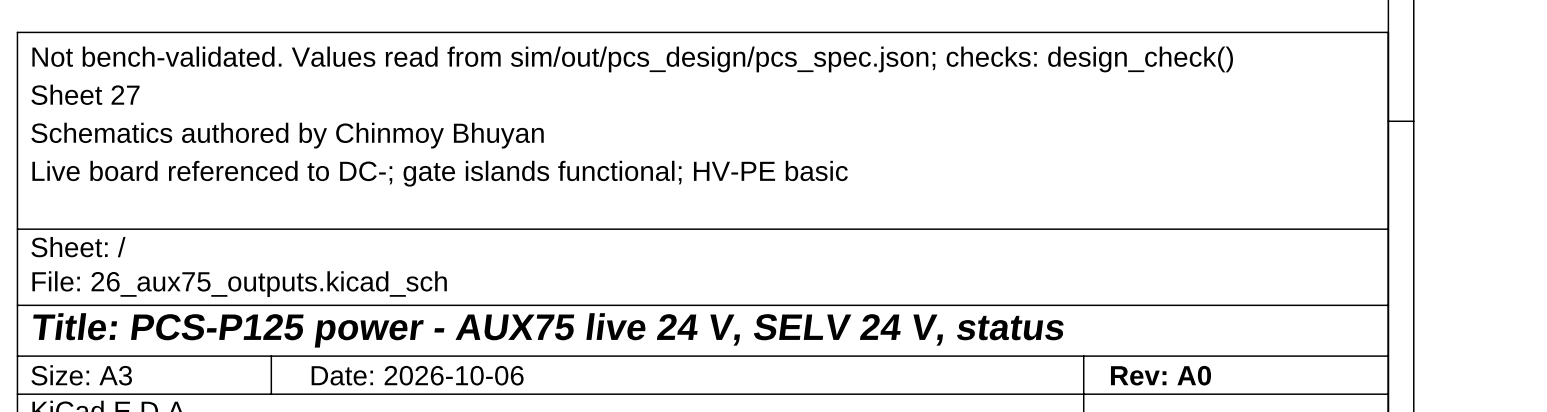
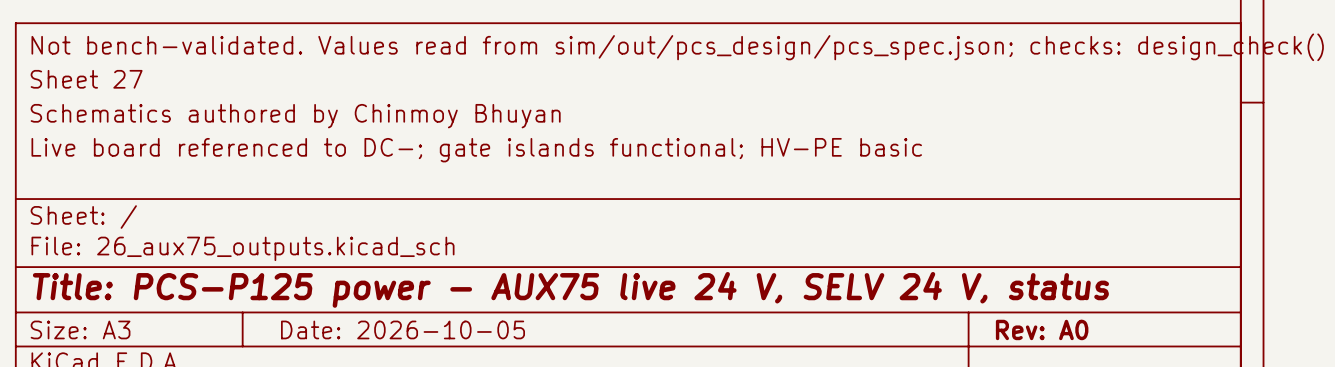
title block: Date: 2026-10-06 (417, 375) -> Date: 2026-10-05 (403, 329)

